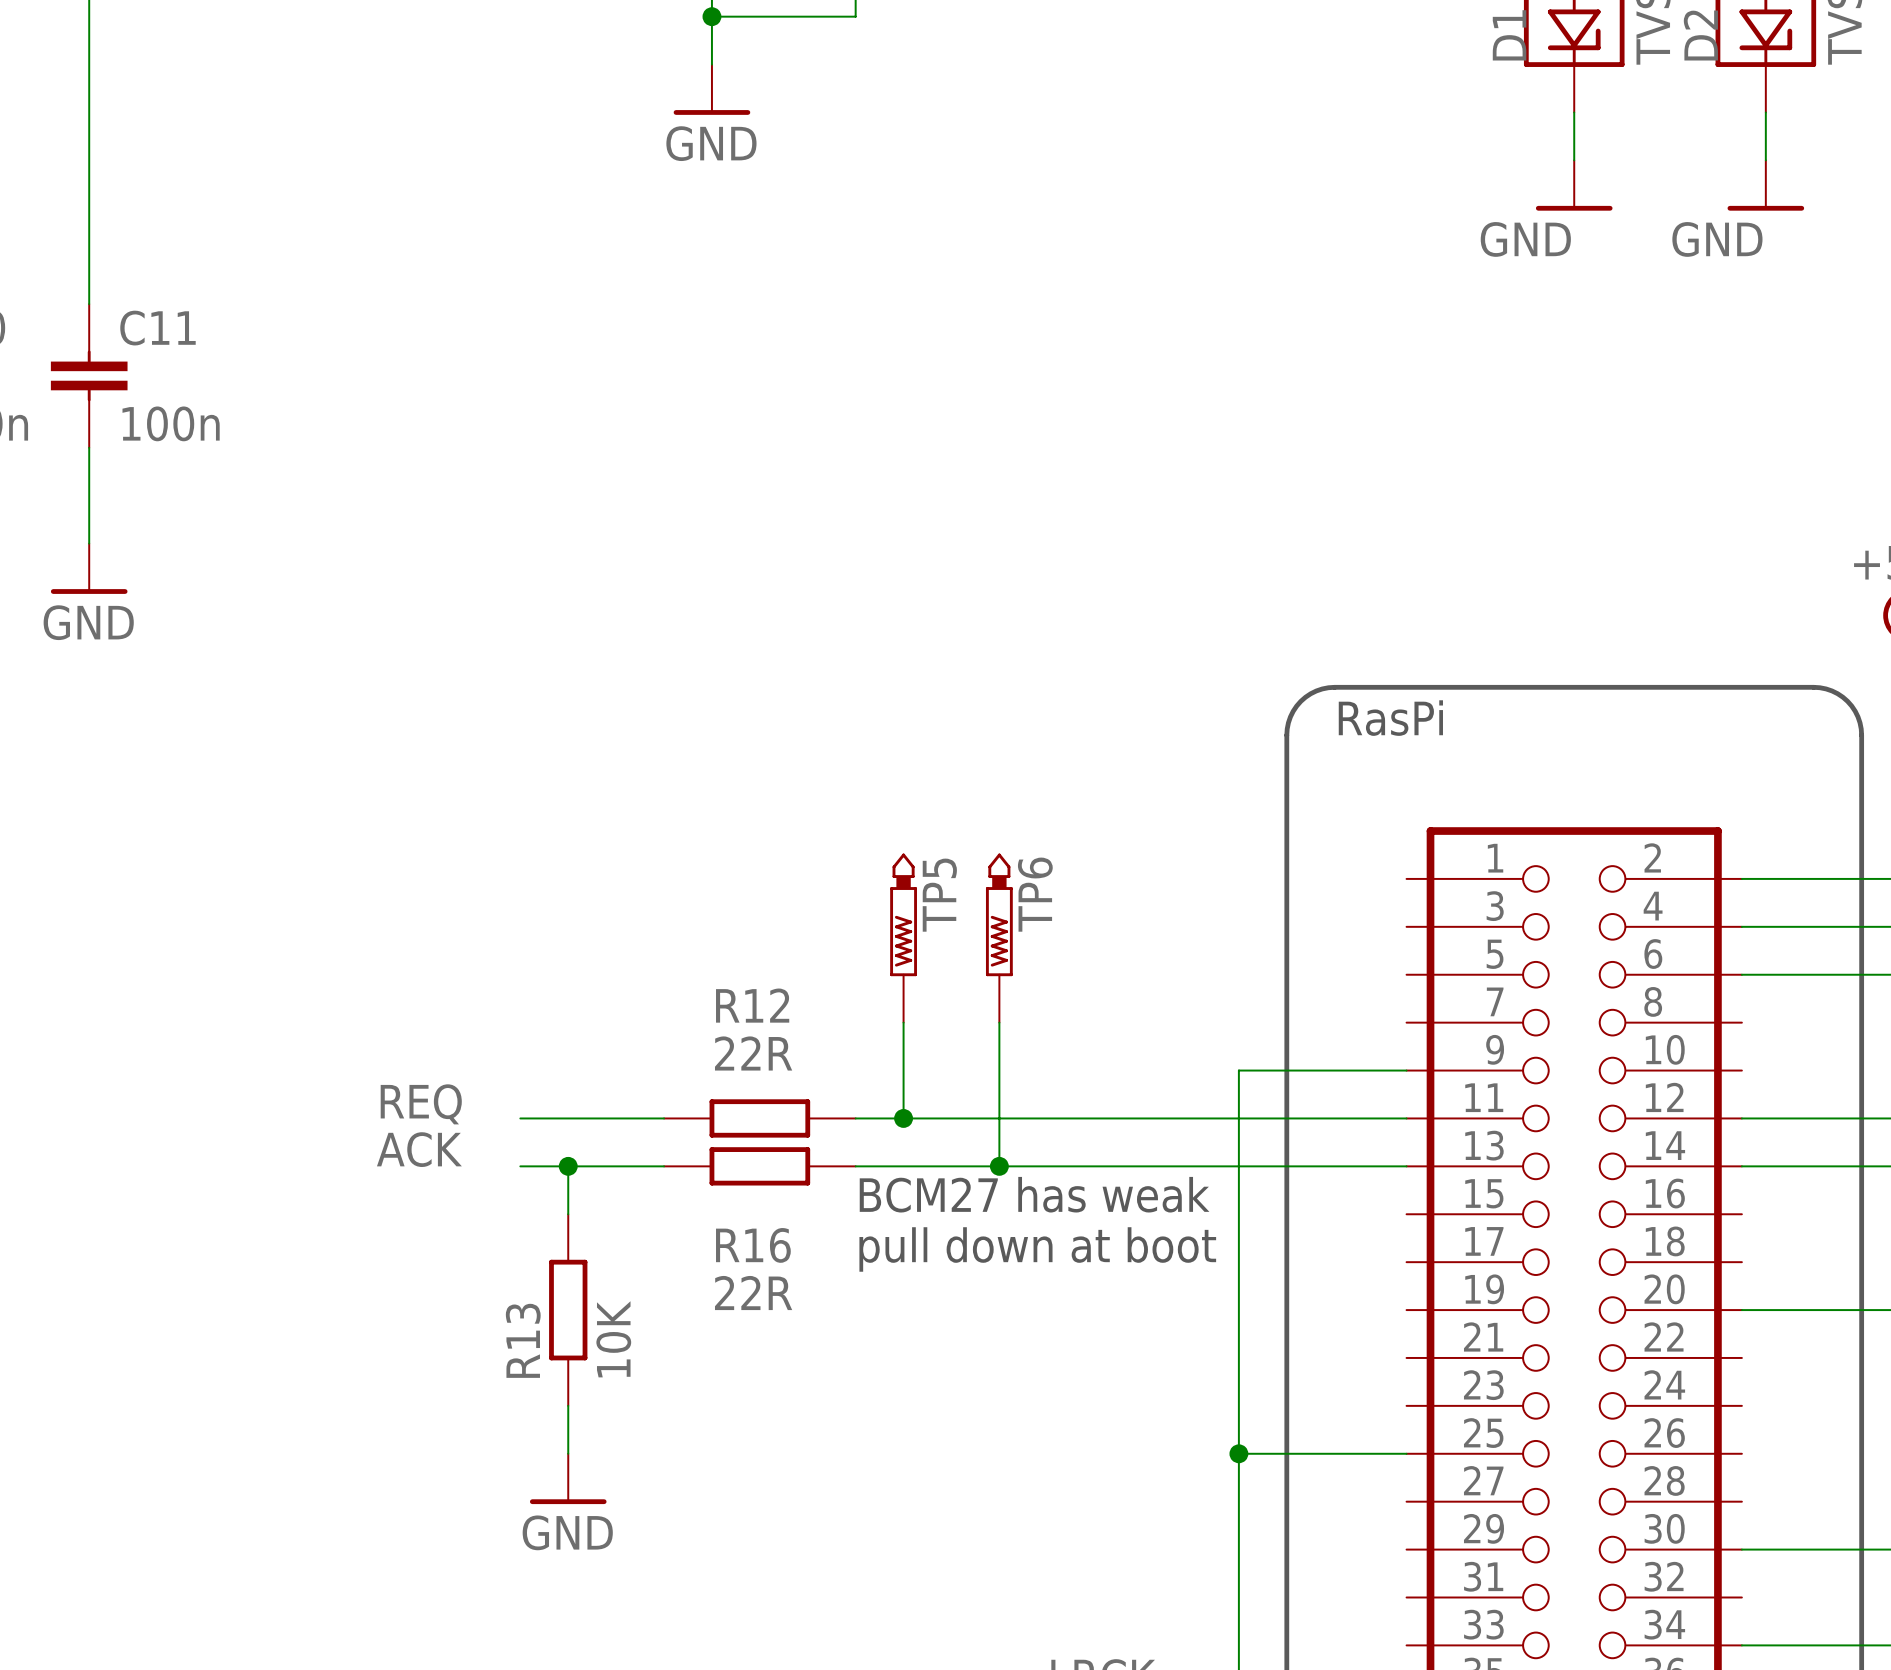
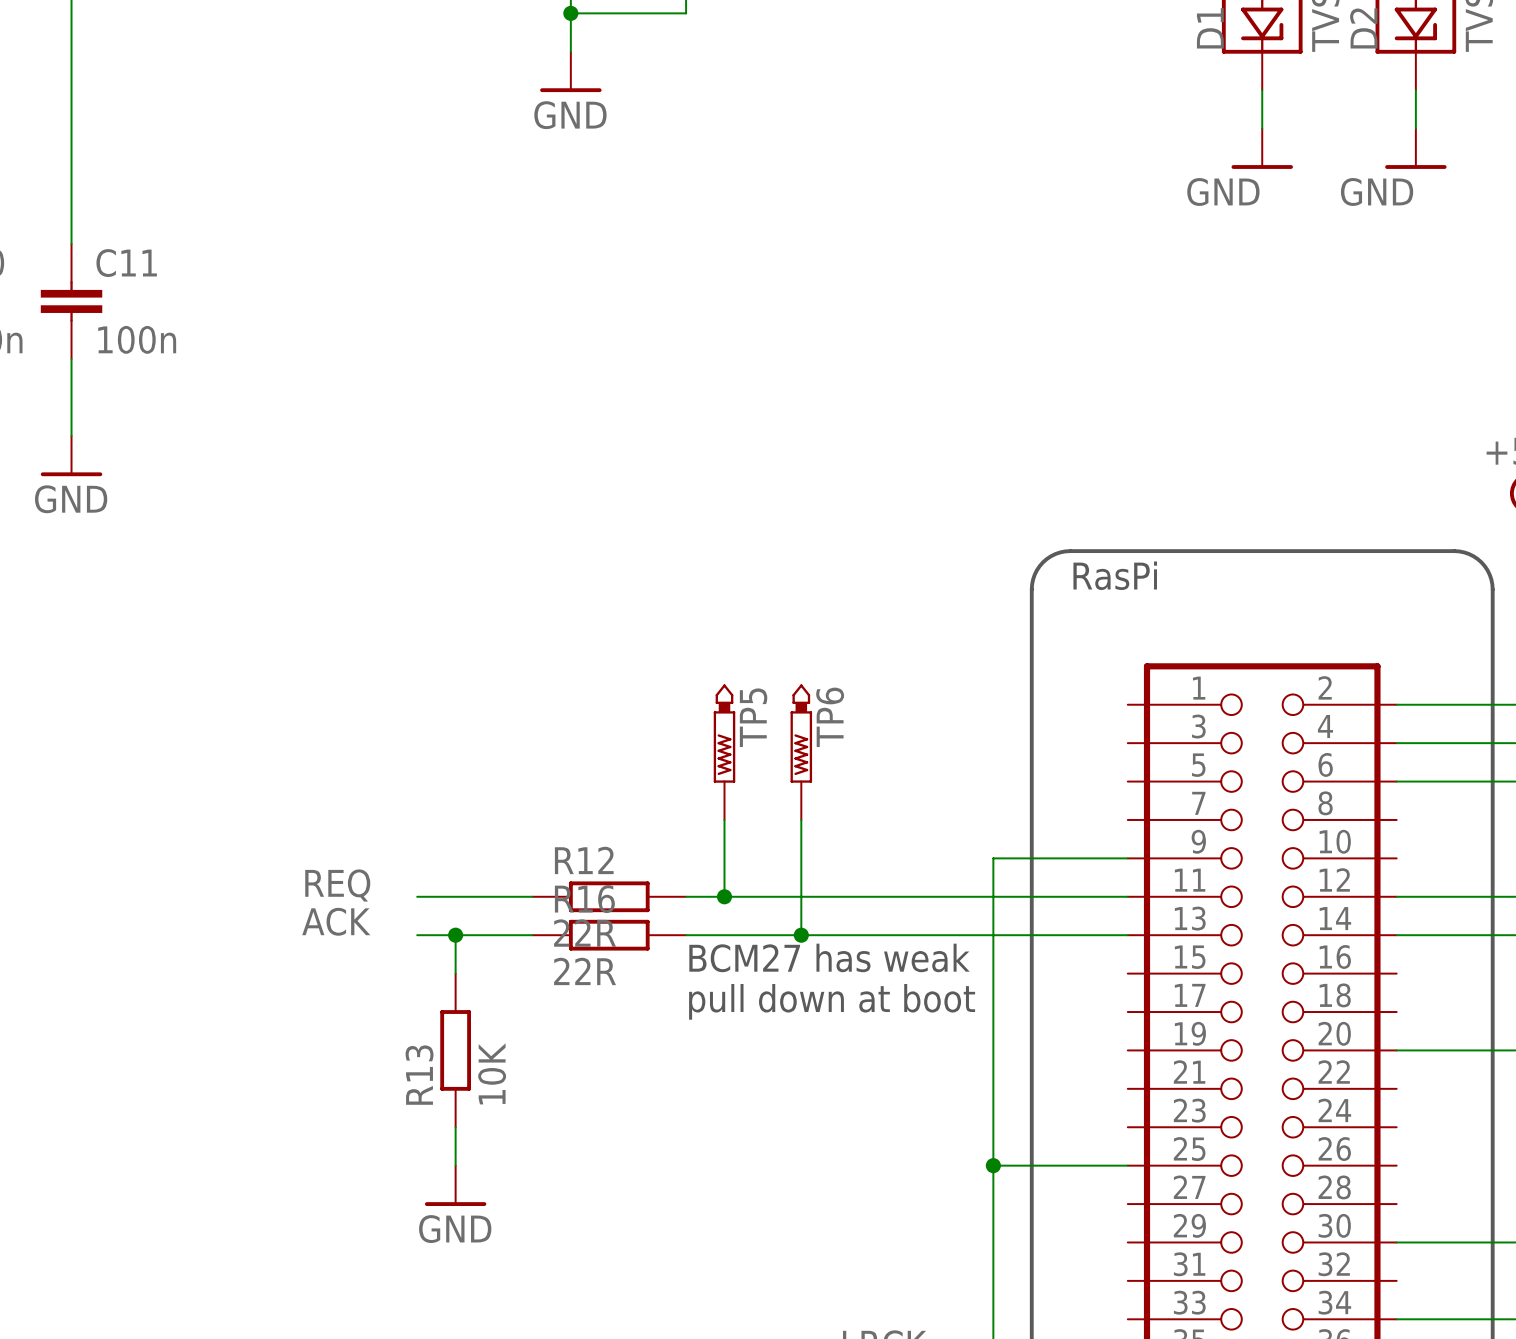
R12 name position: R12 (752, 1005) -> R12 (584, 860)
R12 value position: 22R (753, 1053) -> 22R (585, 933)
R16 name position: R16 (753, 1245) -> R16 (584, 899)
R16 value position: 22R (753, 1293) -> 22R (585, 971)

